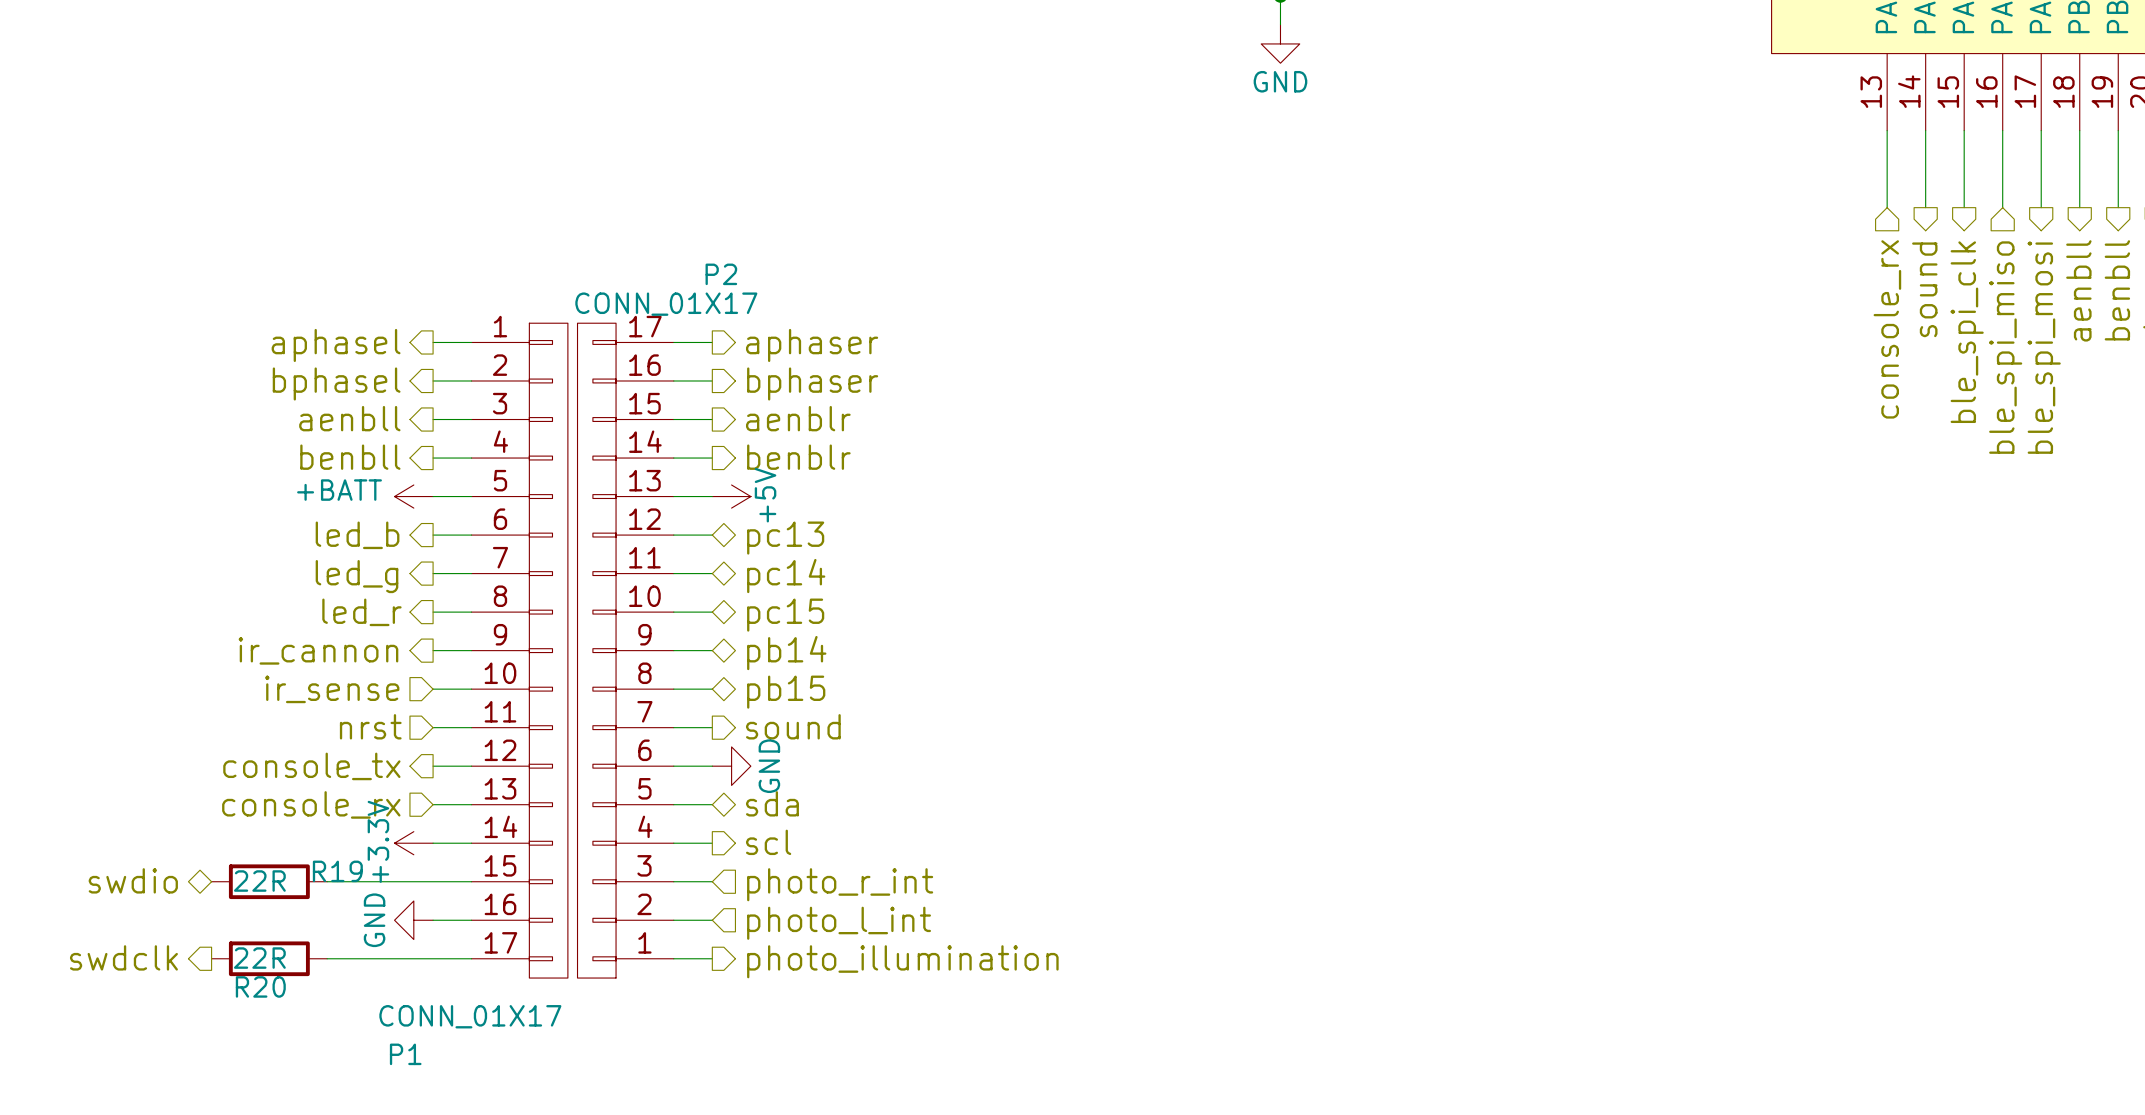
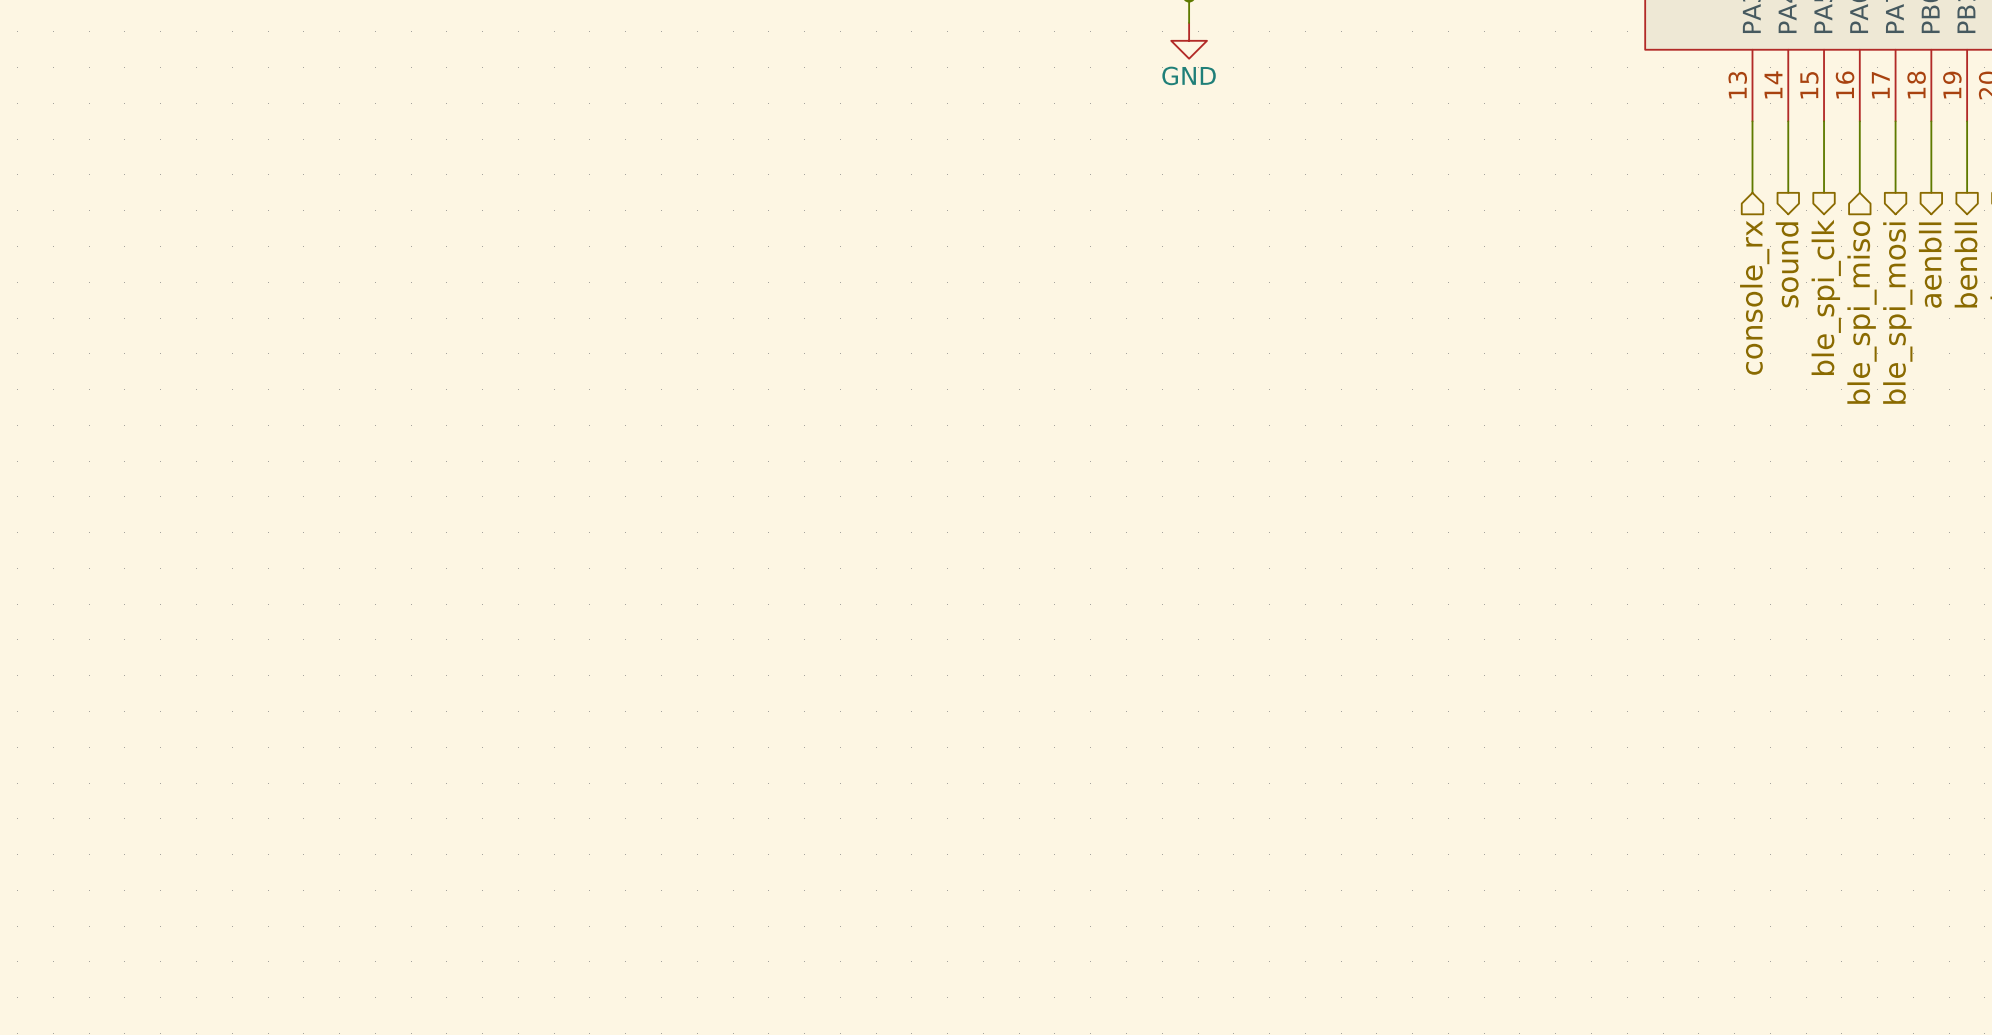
wire: (433, 342) (471, 342) -> none
wire: (673, 342) (712, 342) -> none
hierarchical label: aphasel (336, 345) -> none
hierarchical label: aphaser (812, 345) -> none
wire: (433, 380) (471, 380) -> none
wire: (673, 380) (712, 380) -> none
hierarchical label: bphasel (336, 383) -> none
hierarchical label: bphaser (812, 383) -> none
hierarchical label: aenbll (349, 418) -> none
hierarchical label: aenblr (798, 418) -> none
wire: (433, 419) (471, 419) -> none
wire: (673, 419) (712, 419) -> none
hierarchical label: benbll (350, 457) -> none
hierarchical label: benblr (798, 457) -> none
wire: (433, 458) (471, 458) -> none
wire: (673, 458) (712, 458) -> none
power symbol: +BATT (413, 496) -> none
wire: (433, 496) (471, 496) -> none
wire: (673, 496) (712, 496) -> none
power symbol: +5V (731, 496) -> none
hierarchical label: led_b (357, 535) -> none
wire: (433, 535) (471, 535) -> none
wire: (673, 535) (712, 535) -> none
hierarchical label: pc13 (785, 538) -> none
wire: (433, 573) (471, 573) -> none
wire: (673, 573) (712, 573) -> none
hierarchical label: led_g (356, 576) -> none
hierarchical label: pc14 (786, 576) -> none
hierarchical label: led_r (361, 612) -> none
wire: (433, 612) (471, 612) -> none
wire: (673, 612) (712, 612) -> none
hierarchical label: pc15 (785, 615) -> none
hierarchical label: ir_cannon (318, 650) -> none
wire: (433, 650) (471, 650) -> none
P1: CONN_01X17 (519, 650) -> none
P2: CONN_01X17 (625, 650) -> none
wire: (673, 650) (712, 650) -> none
hierarchical label: pb14 (786, 653) -> none
hierarchical label: ir_sense (332, 689) -> none
wire: (433, 689) (471, 689) -> none
wire: (673, 689) (712, 689) -> none
hierarchical label: pb15 (786, 692) -> none
hierarchical label: nrst (370, 726) -> none
hierarchical label: sound (793, 726) -> none
wire: (433, 727) (471, 727) -> none
wire: (673, 727) (712, 727) -> none
hierarchical label: console_tx (311, 766) -> none
wire: (433, 766) (471, 766) -> none
wire: (673, 766) (712, 766) -> none
power symbol: GND (731, 766) -> none
hierarchical label: sda (772, 803) -> none
hierarchical label: console_rx (311, 804) -> none
wire: (433, 804) (471, 804) -> none
wire: (673, 804) (712, 804) -> none
hierarchical label: scl (768, 842) -> none
power symbol: +3.3V (413, 843) -> none
wire: (433, 843) (471, 843) -> none
wire: (673, 843) (712, 843) -> none
hierarchical label: swdio (133, 880) -> none
R19: 22R (269, 881) -> none
wire: (327, 881) (471, 881) -> none
wire: (673, 881) (712, 881) -> none
hierarchical label: photo_r_int (840, 884) -> none
power symbol: GND (413, 920) -> none
wire: (433, 920) (471, 920) -> none
wire: (673, 920) (712, 920) -> none
hierarchical label: photo_l_int (839, 923) -> none
hierarchical label: swdclk (123, 957) -> none
R20: 22R (269, 958) -> none
wire: (327, 958) (471, 958) -> none
wire: (673, 958) (712, 958) -> none
hierarchical label: photo_illumination (902, 961) -> none

